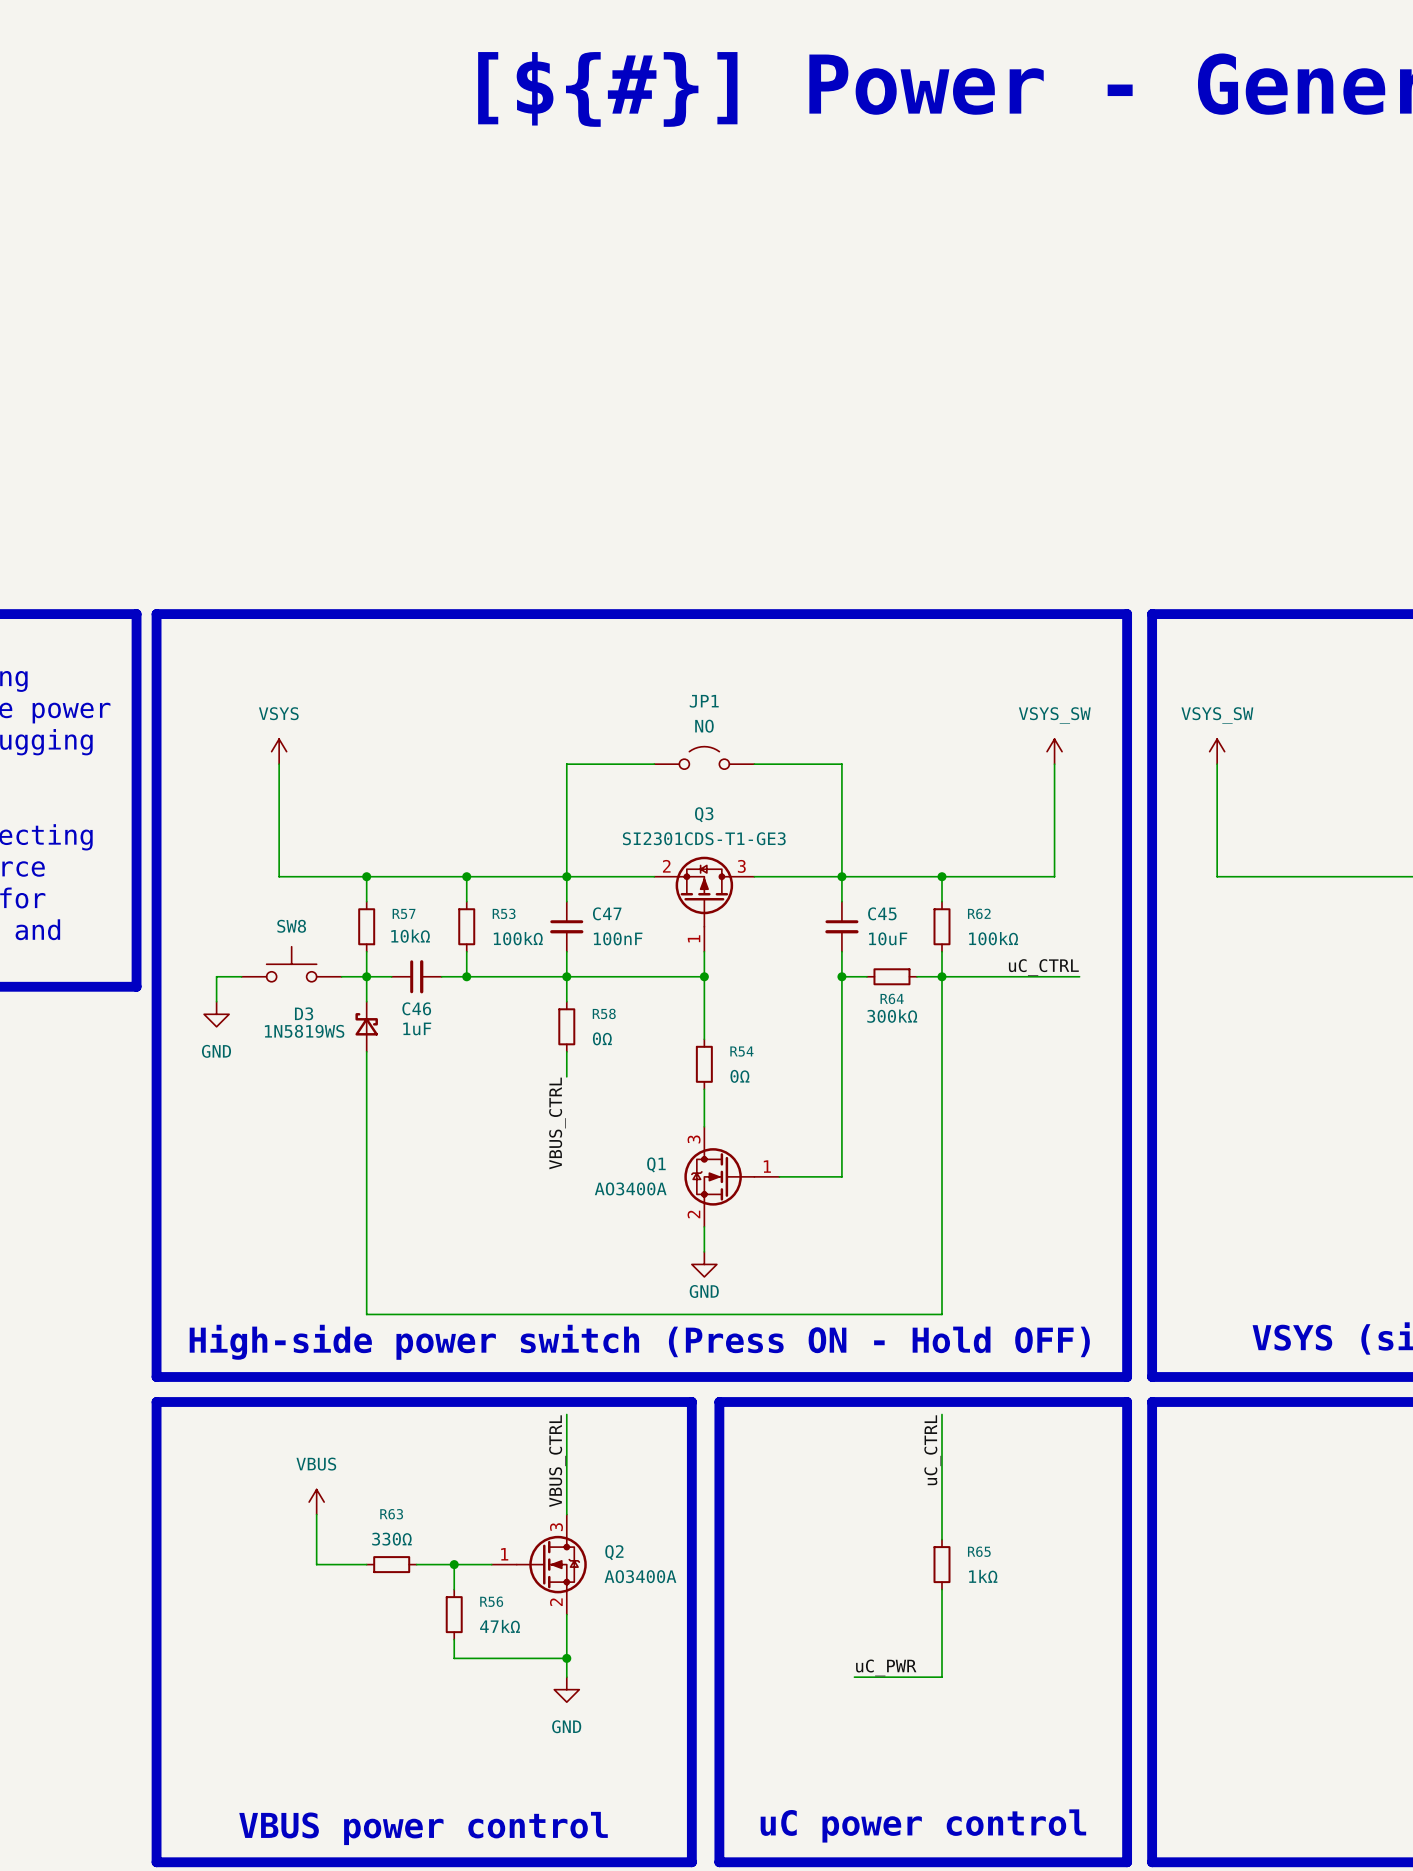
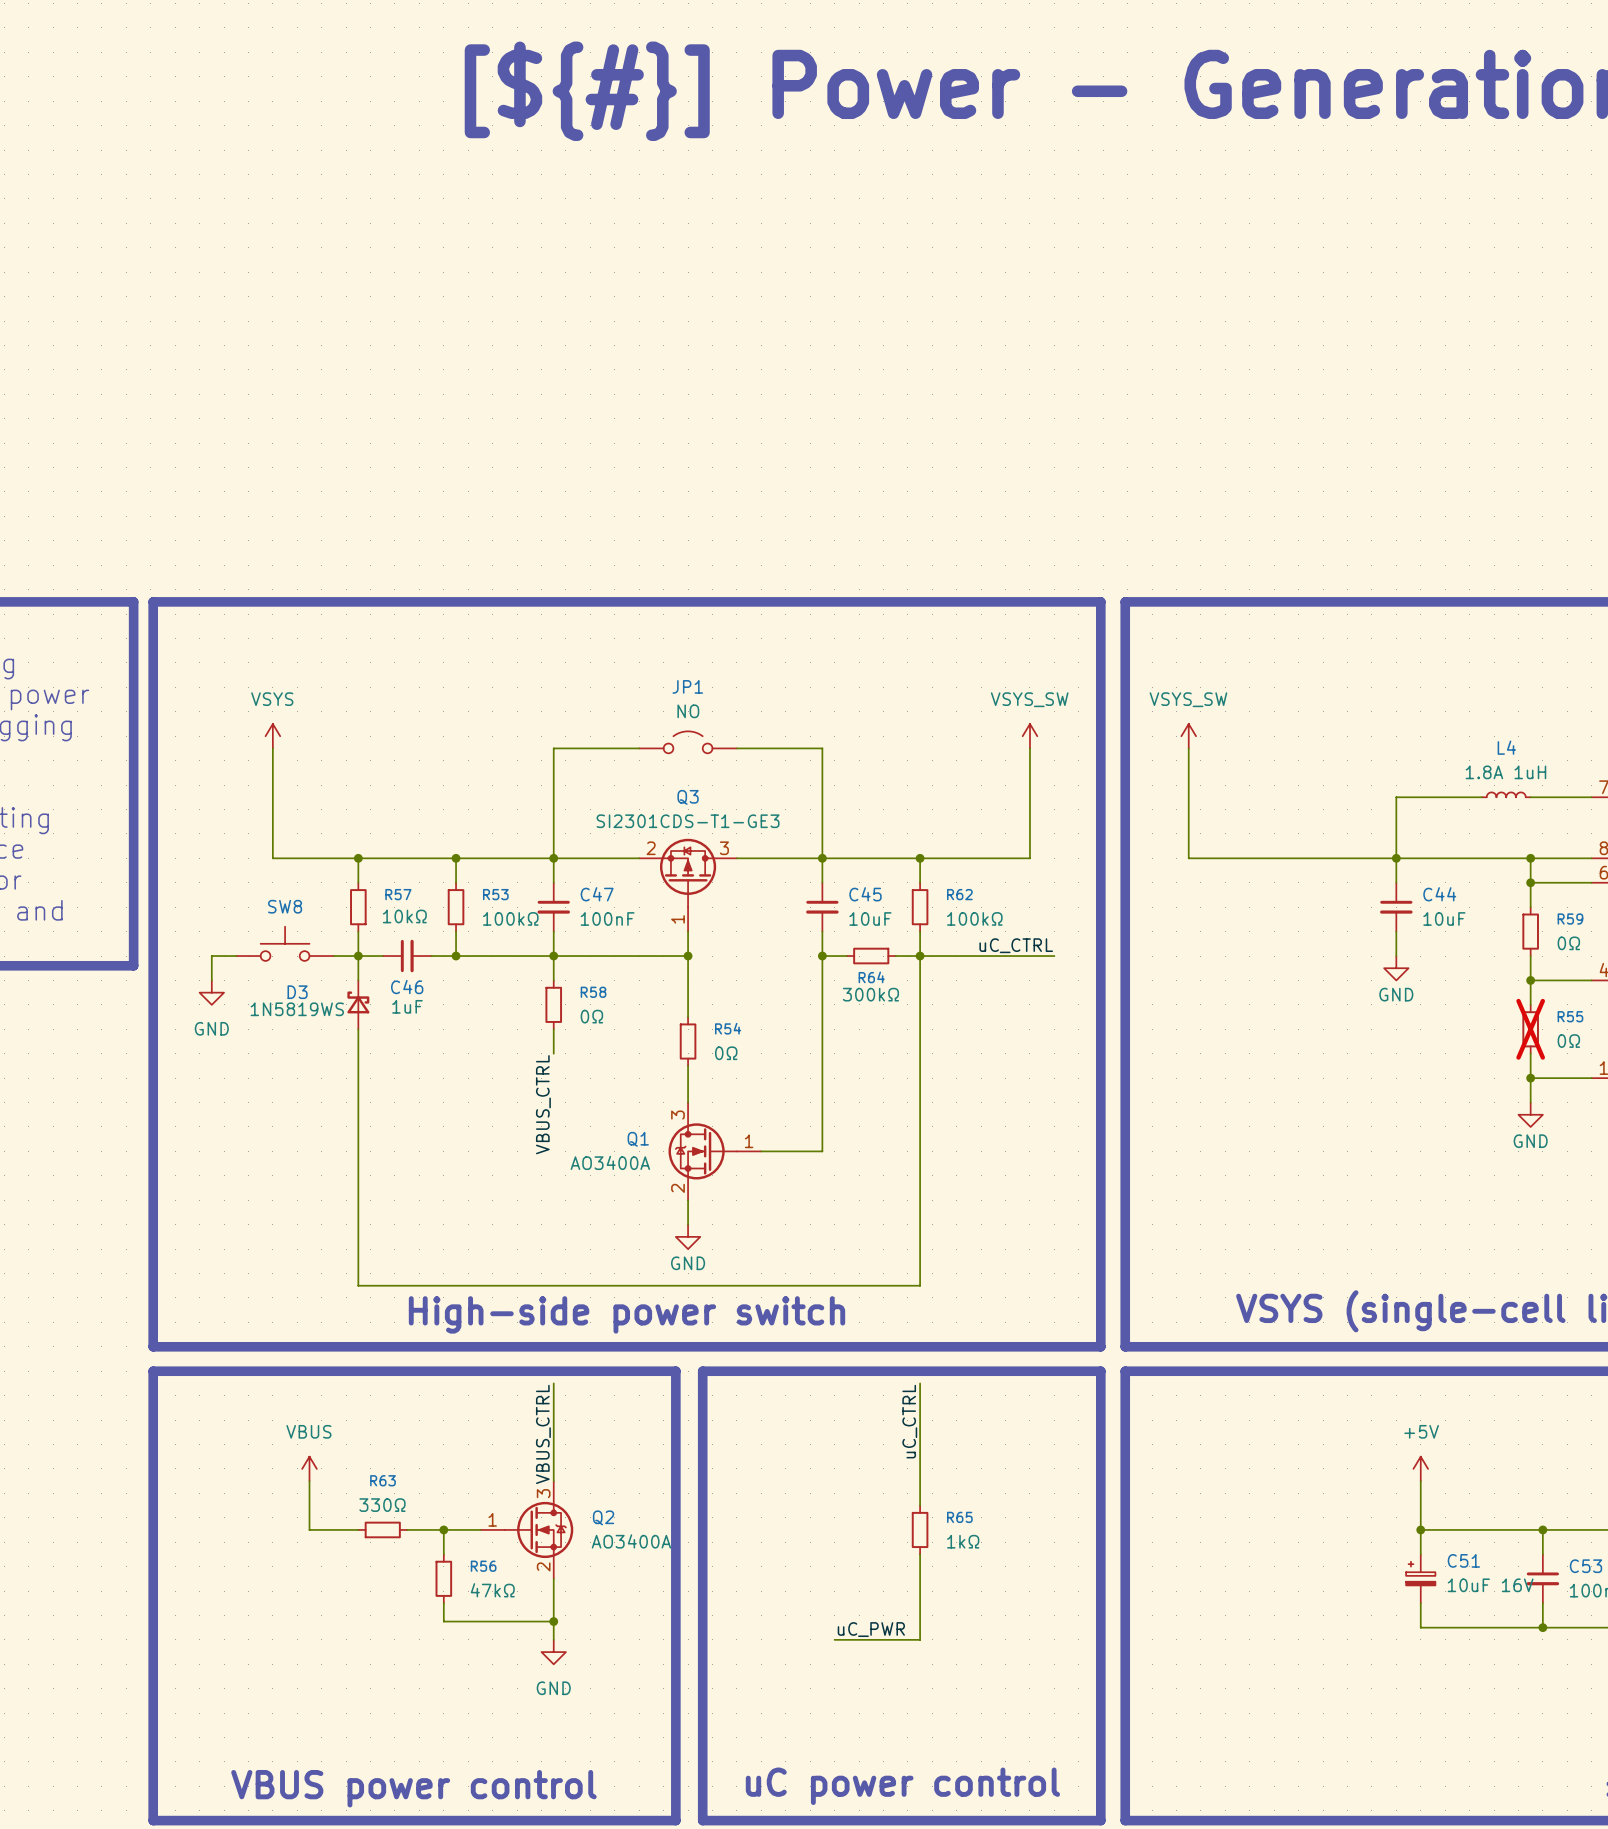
text: High-side power switch (Press ON - Hold OFF) (639, 1342) -> High-side power switch (627, 1314)

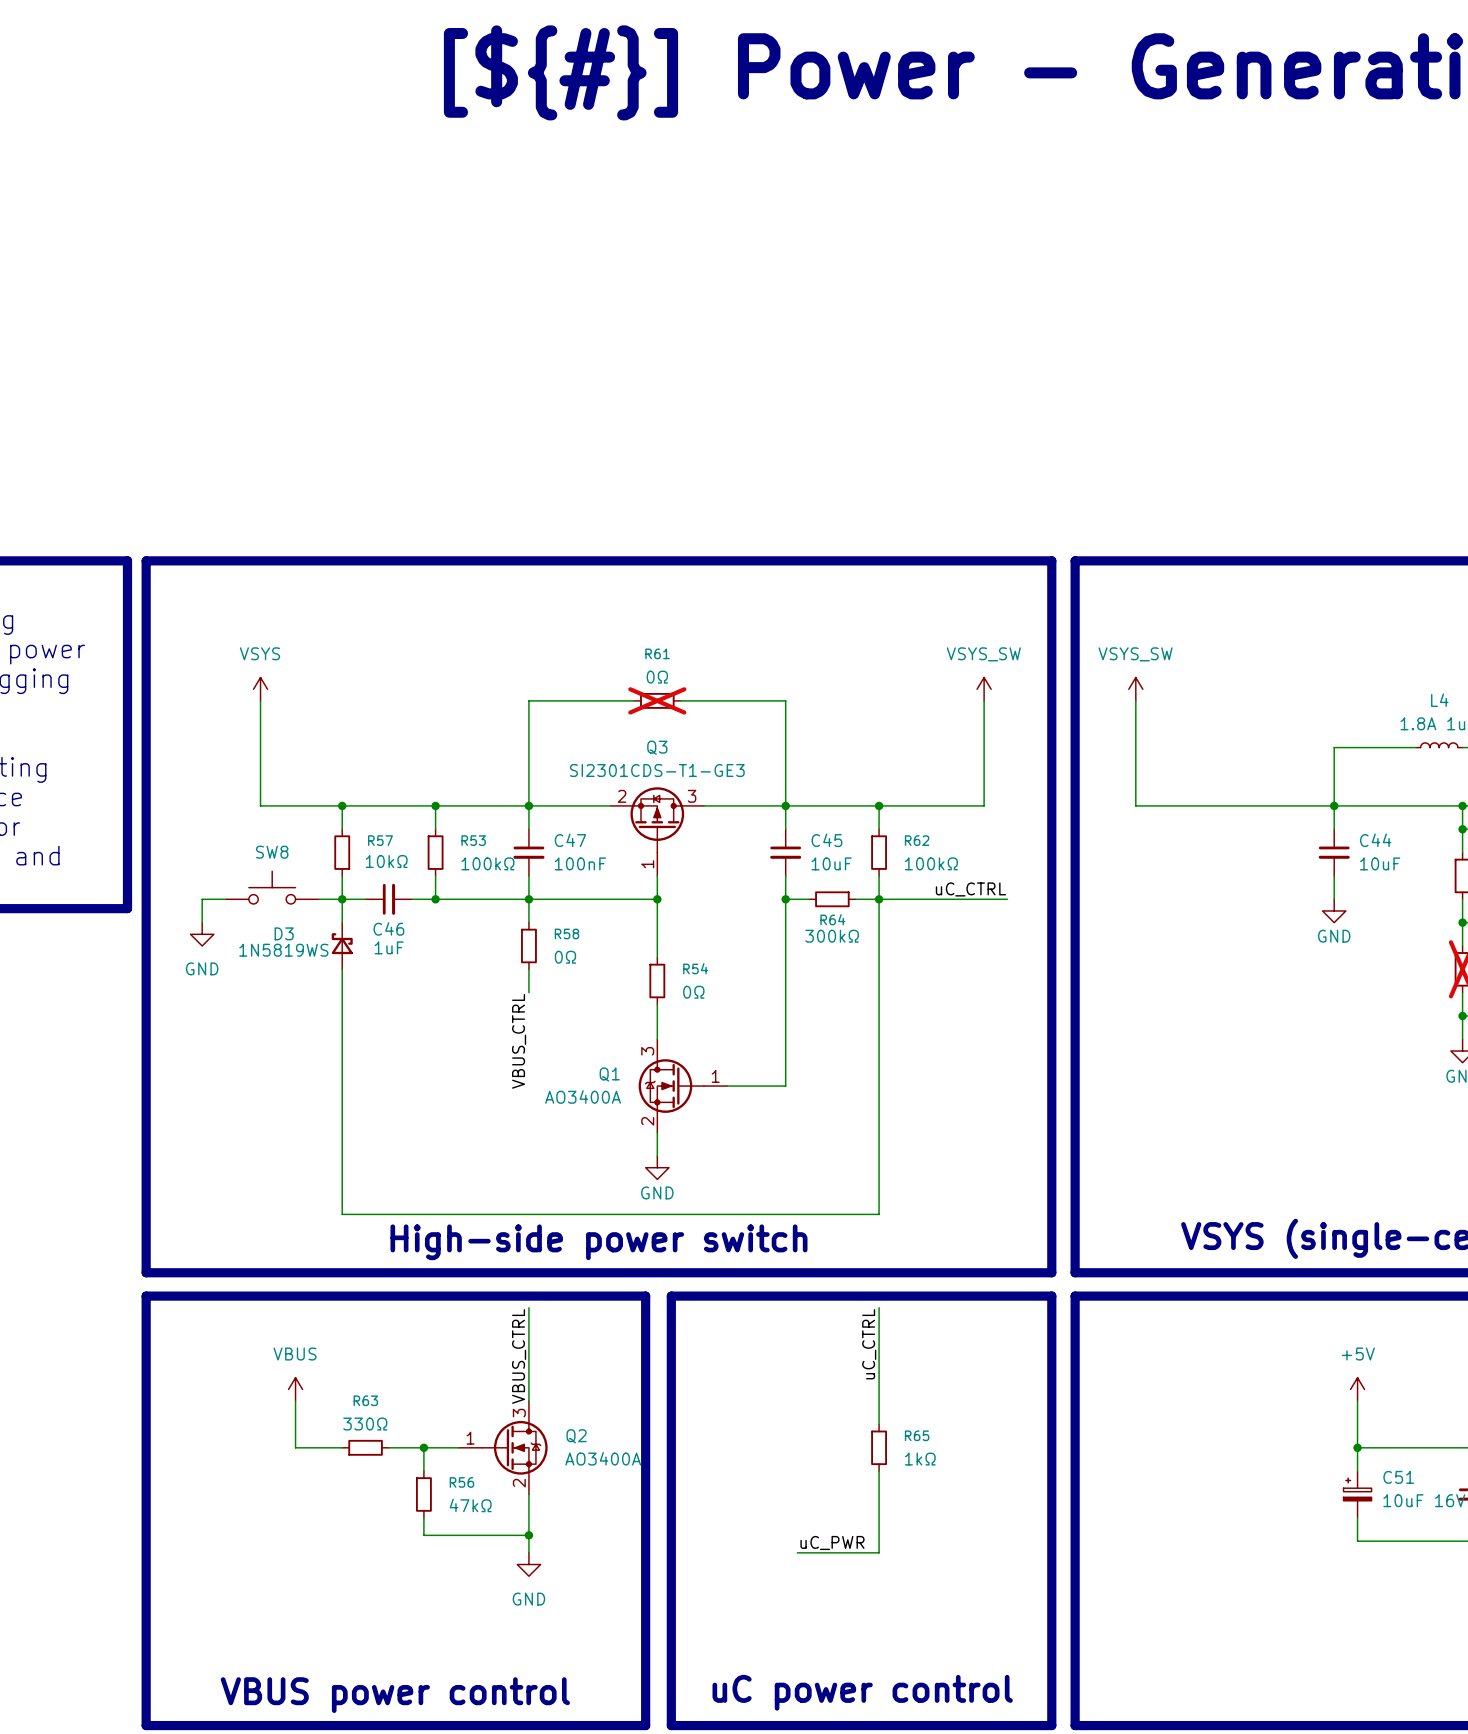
JP1: NO (688, 742) -> none
R61: none -> 0Ω (657, 700)

